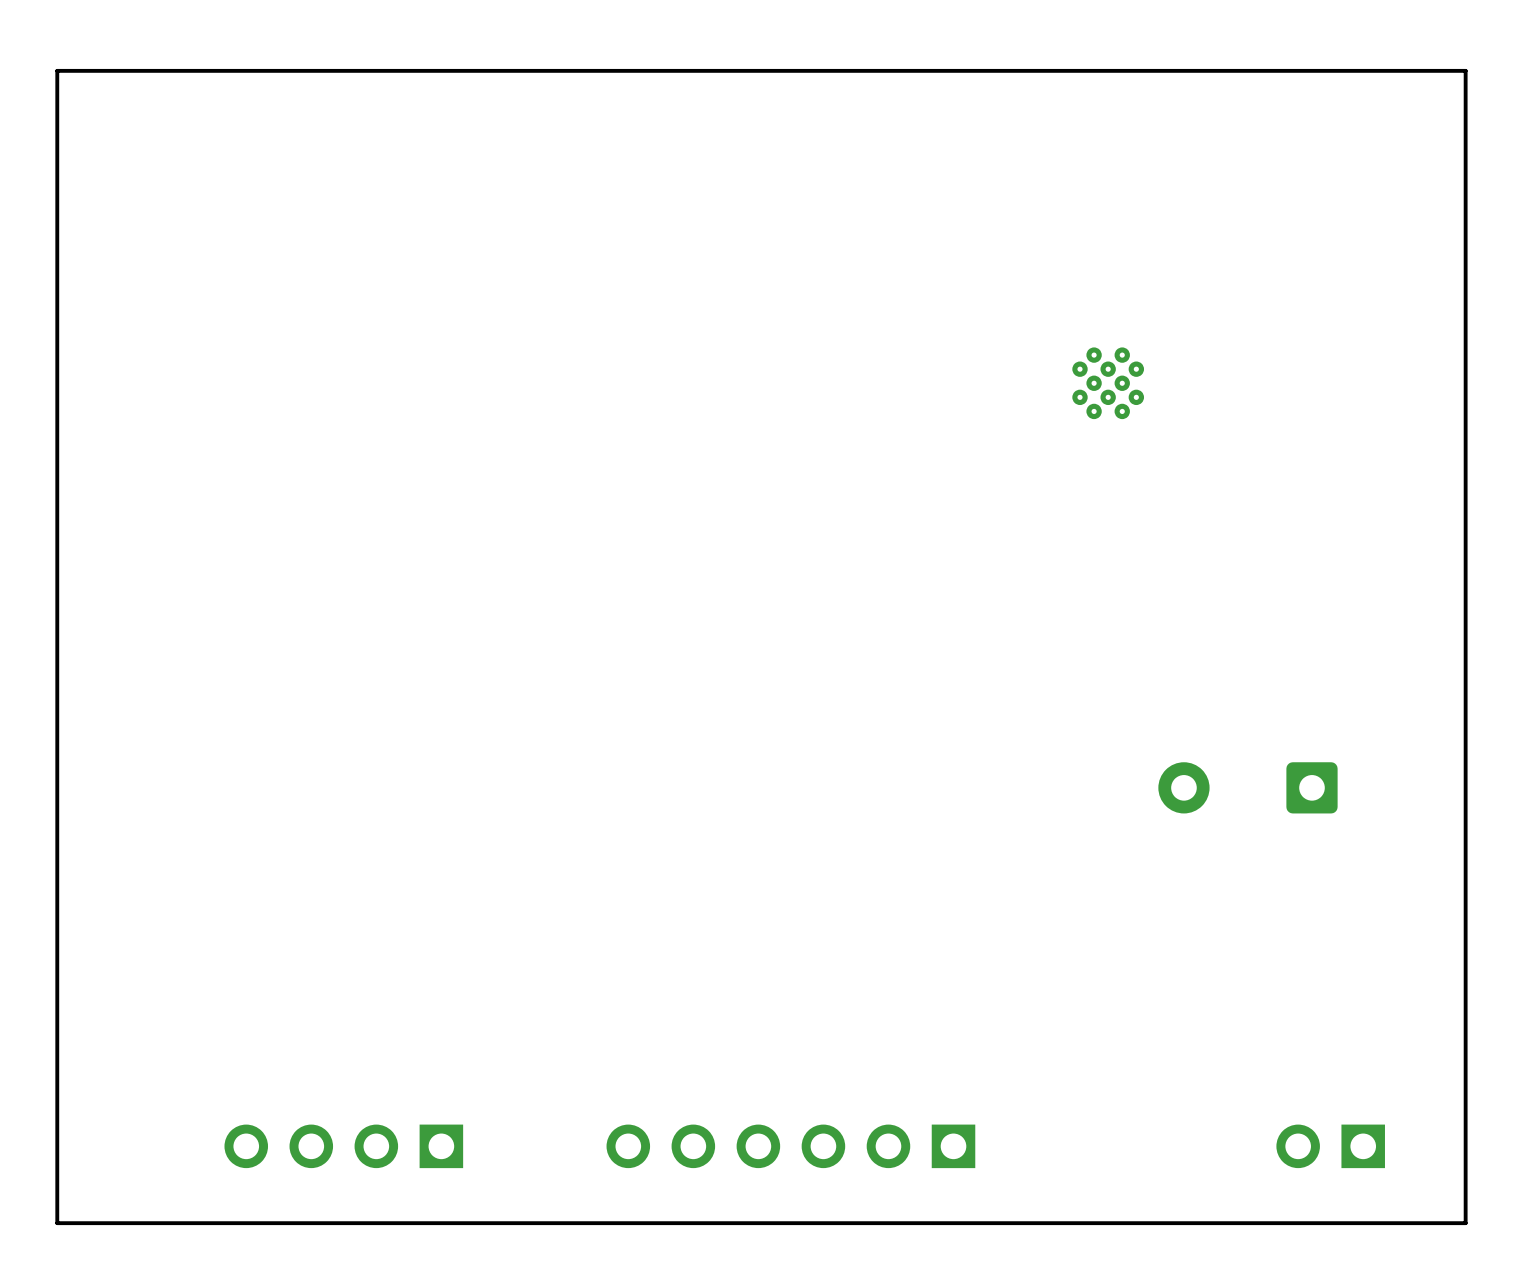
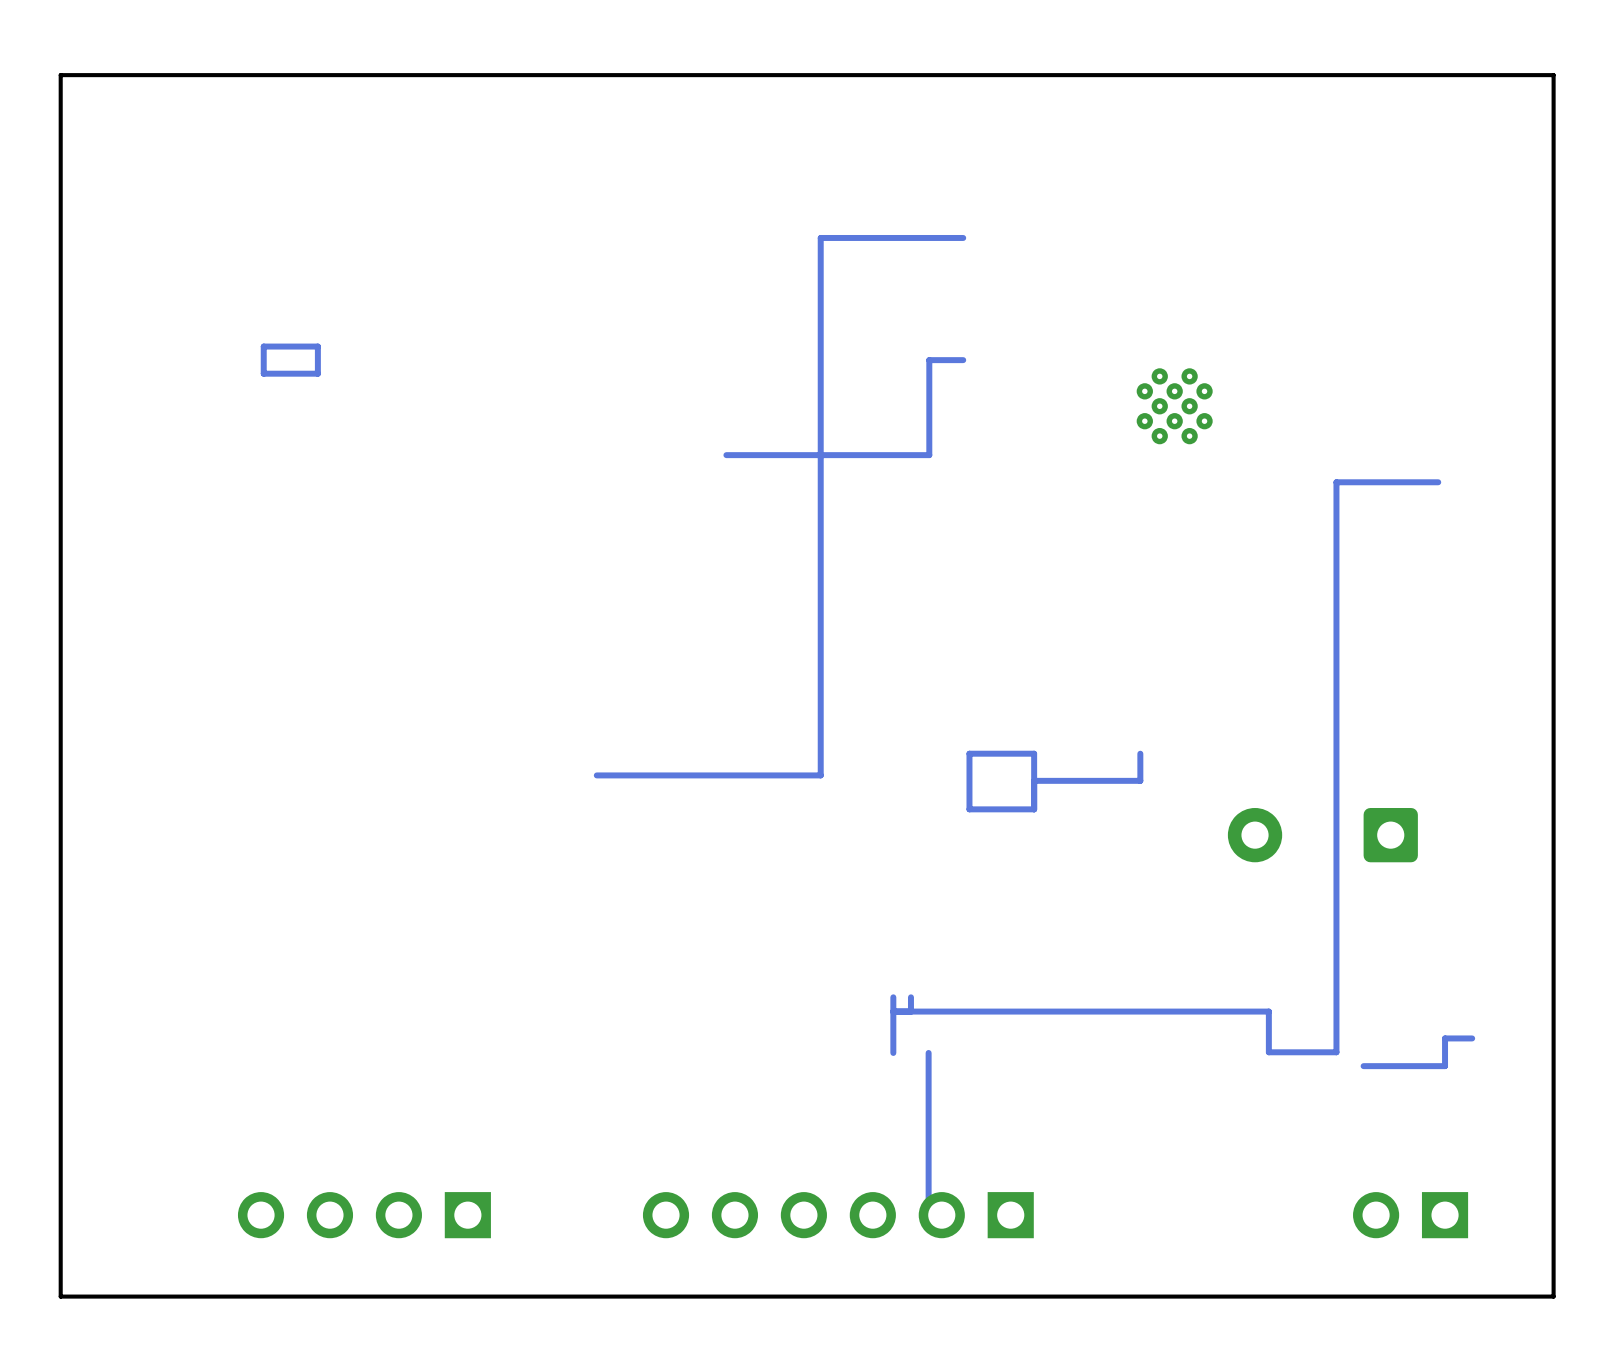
track: none -> (963, 237) (820, 237) (820, 775) (596, 775)
track: none -> (317, 346) (263, 346) (263, 373) (317, 373) (317, 346)
track: none -> (963, 360) (929, 360) (929, 455) (726, 455)
track: none -> (1438, 482) (1336, 482) (1336, 1052) (1268, 1052) (1268, 1011) (893, 1011)
track: none -> (1034, 753) (969, 753) (969, 809) (1034, 809) (1034, 753)
track: none -> (1140, 753) (1140, 780) (1034, 780)
track: none -> (893, 997) (893, 1052)
track: none -> (910, 997) (910, 1011)
track: none -> (1472, 1038) (1445, 1038) (1445, 1066) (1363, 1066)
track: none -> (928, 1052) (928, 1215) (941, 1215)

